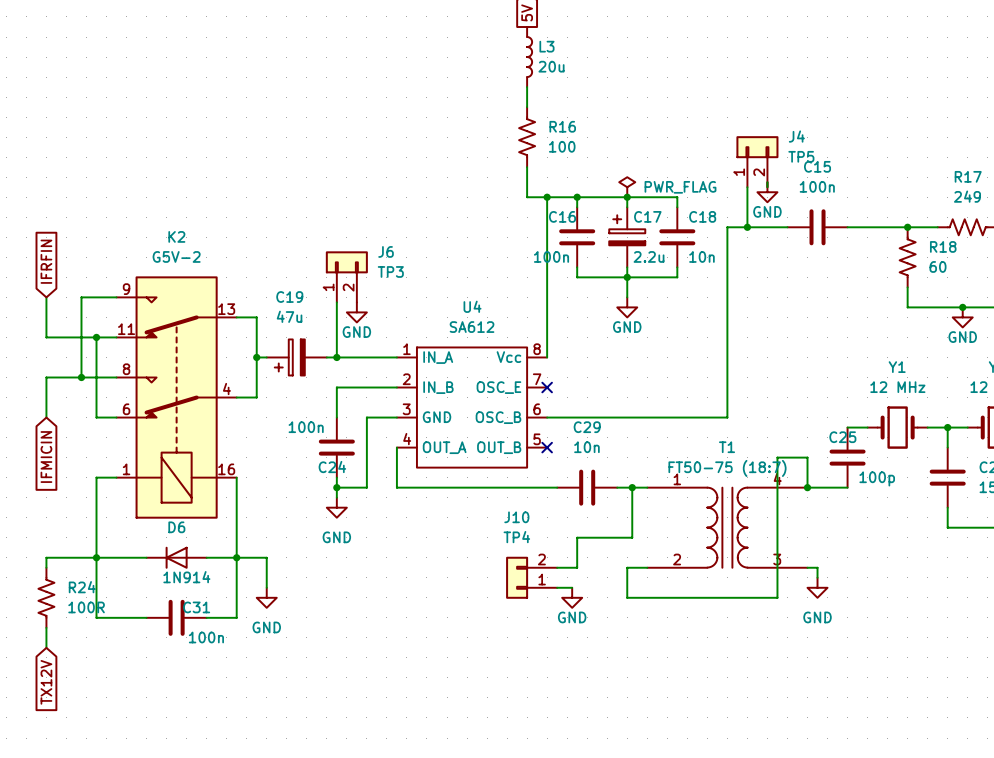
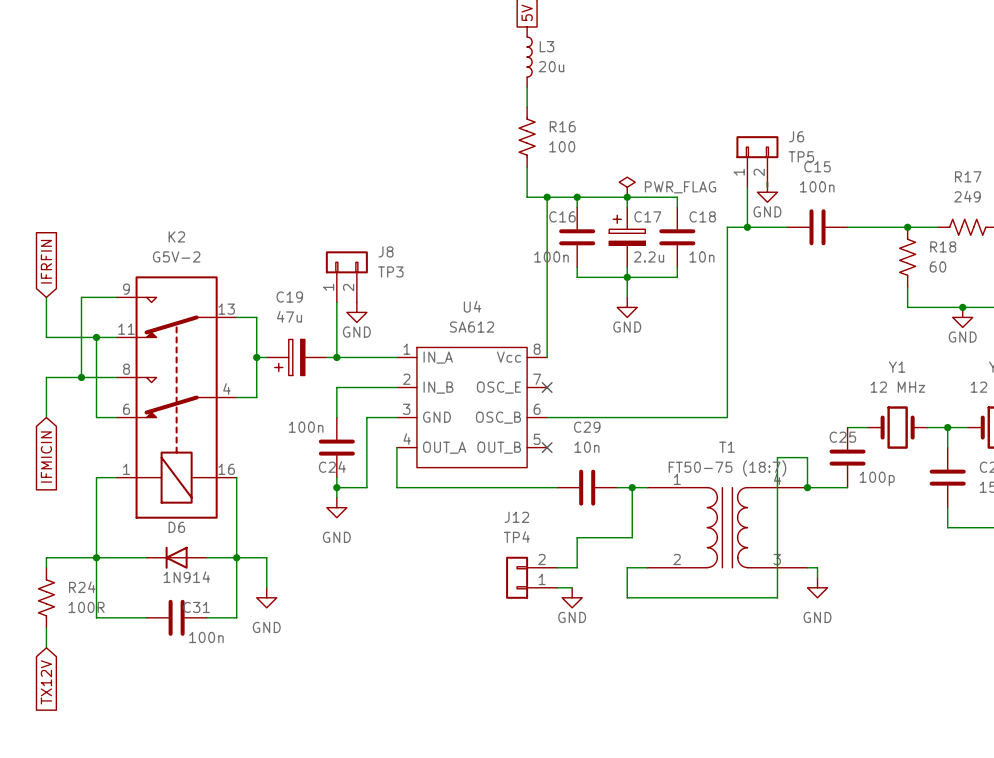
J4 name: J4 (796, 136) -> J6 (796, 136)
J6 name: J6 (386, 251) -> J8 (386, 251)
J10 name: J10 (516, 517) -> J12 (516, 517)

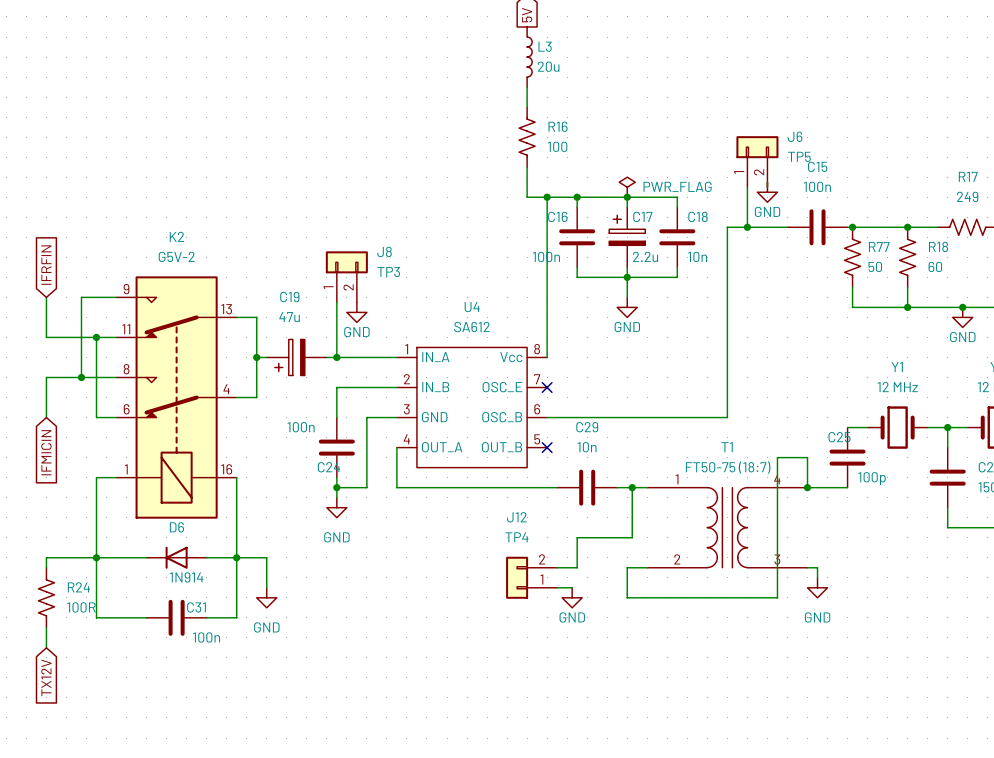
junction: none -> (852, 227)
R77: none -> 50 (852, 257)
wire: none -> (852, 287) (852, 307) (907, 307)
junction: none -> (907, 307)

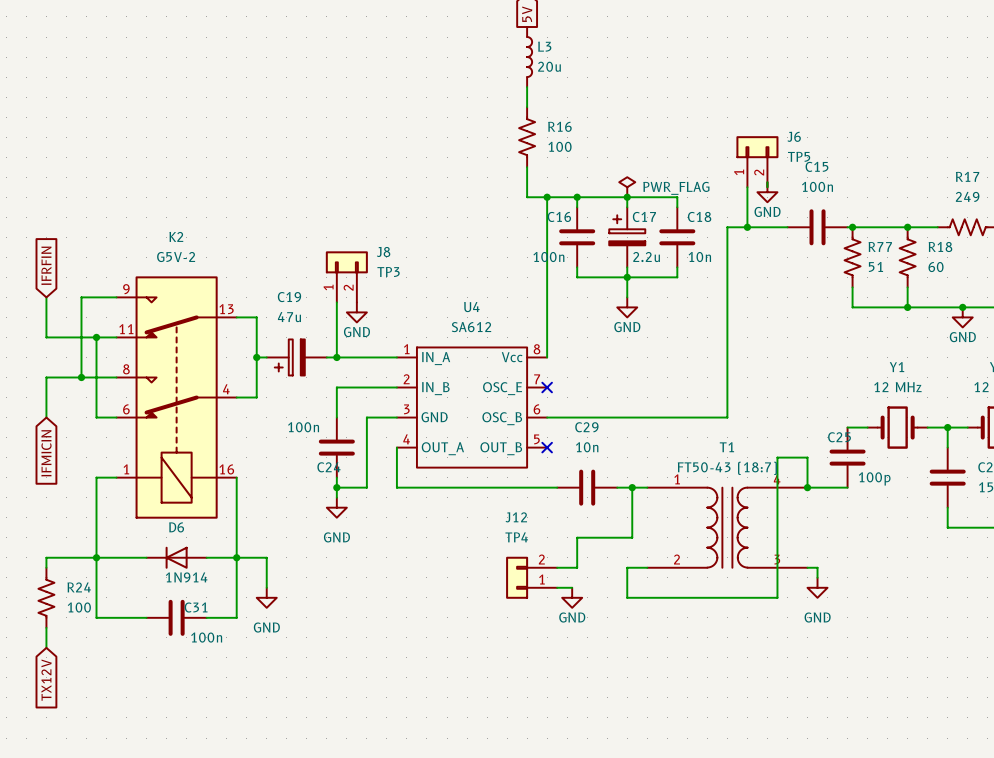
R77 value: 50 (875, 266) -> 51 (875, 266)
T1 value: FT50-75 (18:7) (728, 467) -> FT50-43 (18:7) (727, 468)
R24 value: 100R (81, 607) -> 100 (79, 607)

